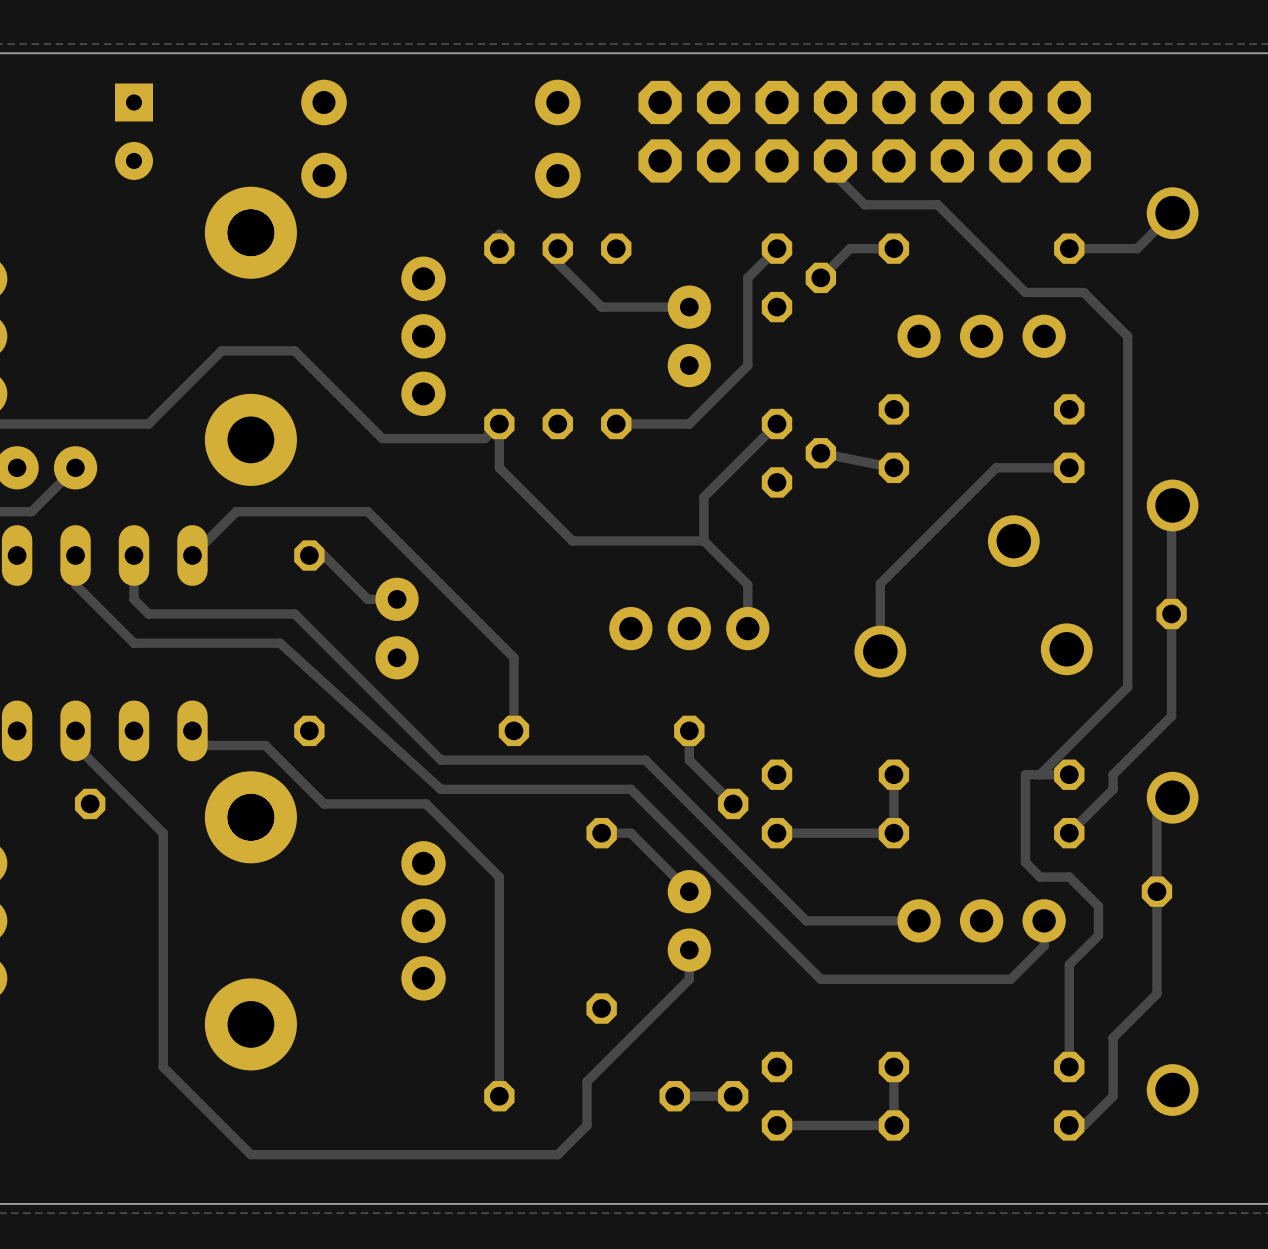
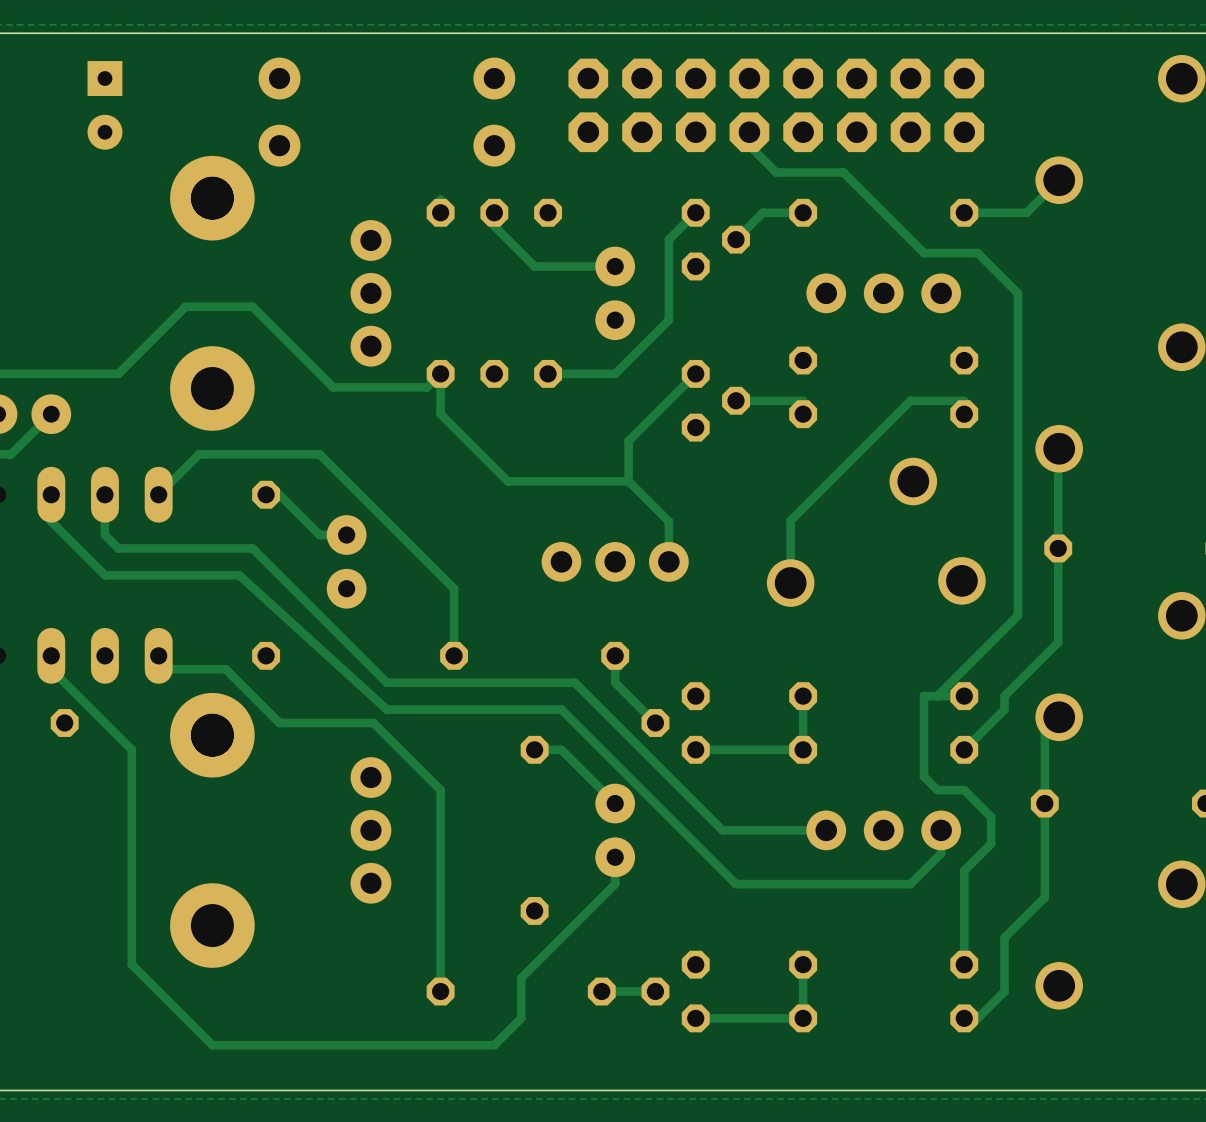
track: (820, 453) (893, 467) -> (736, 400) (803, 400)
track: (1069, 467) (996, 467) -> (964, 400) (910, 400) (897, 414)

